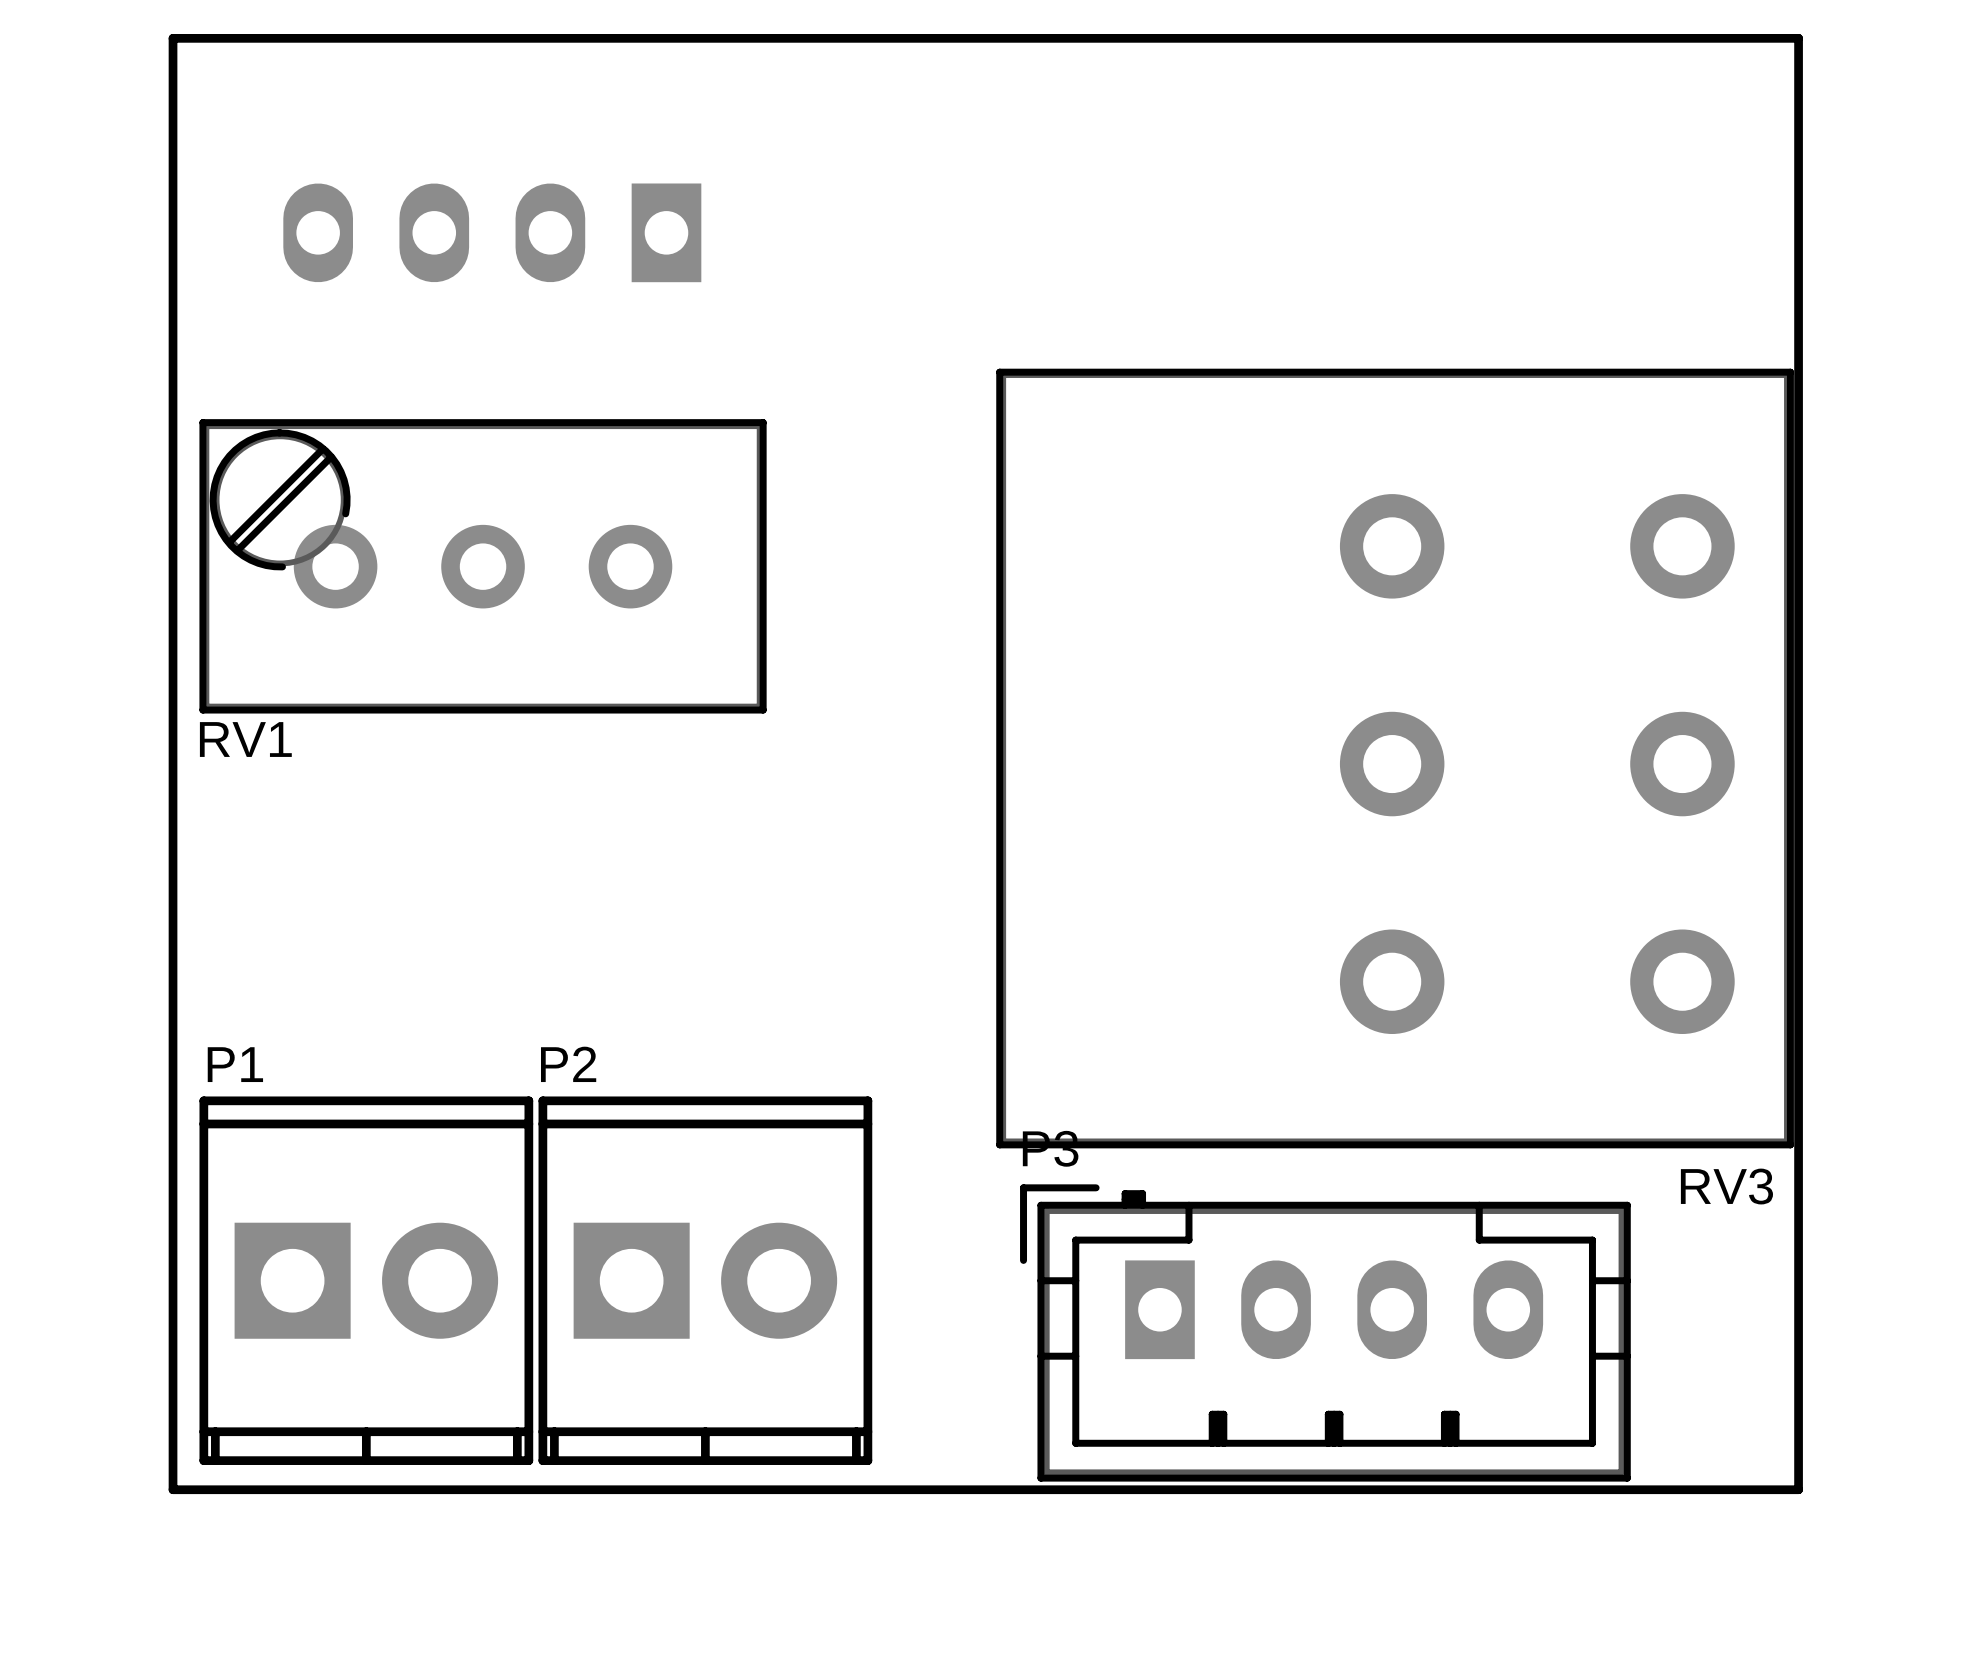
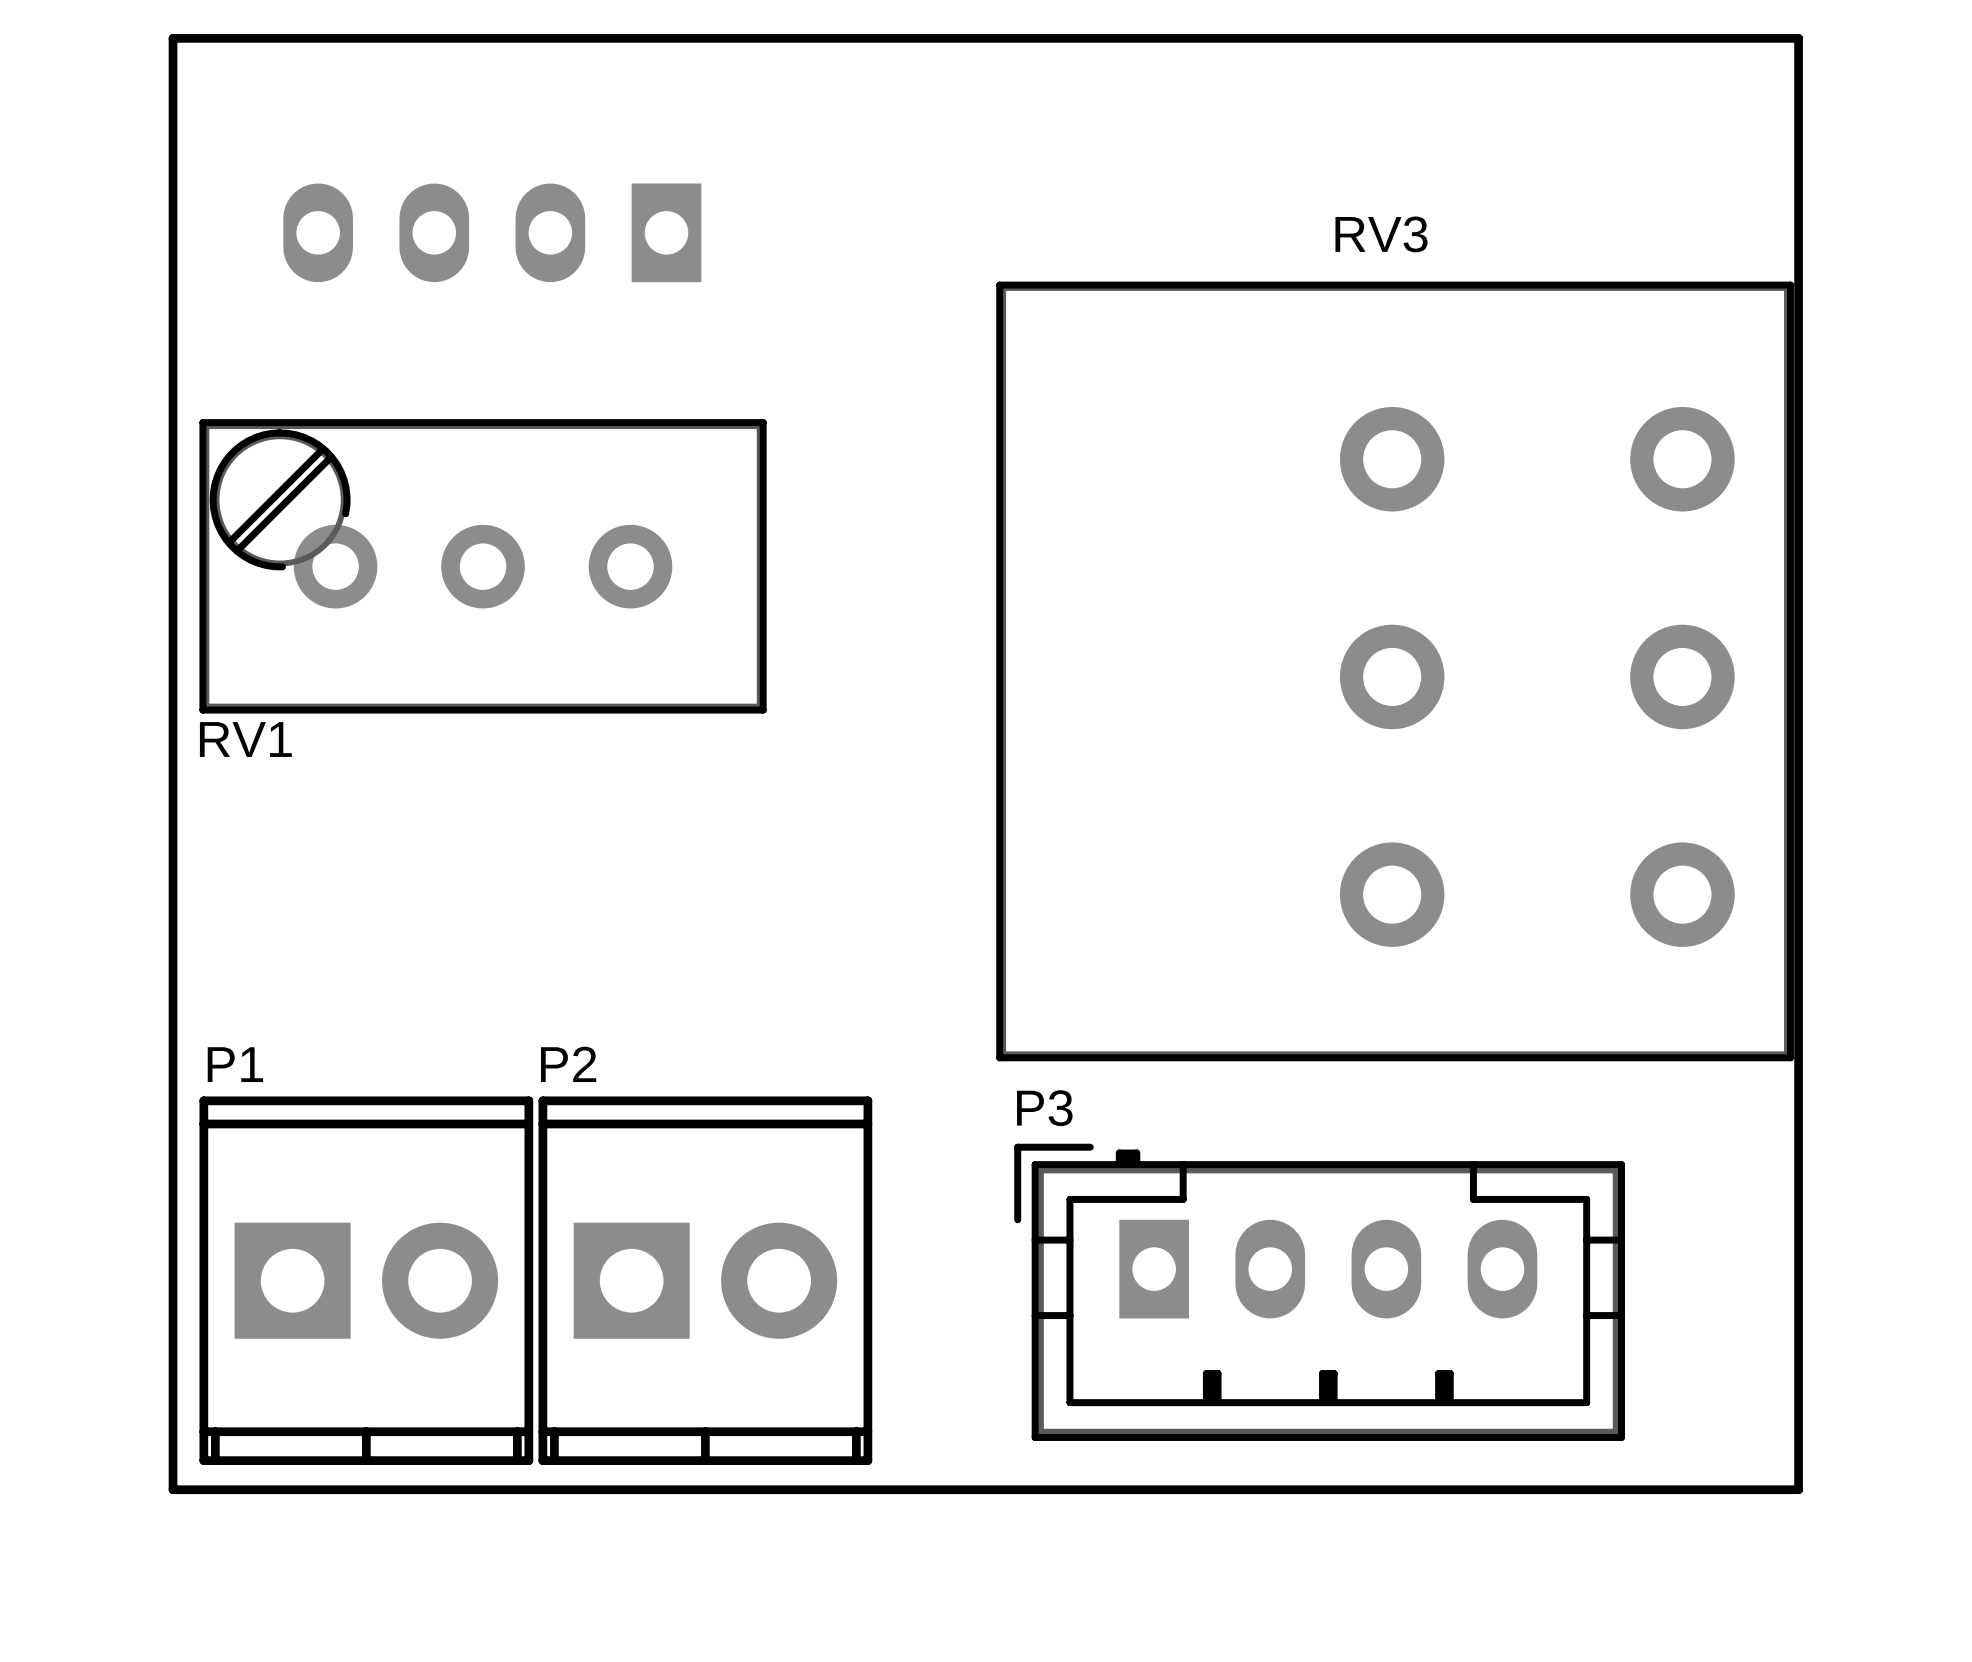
RV3 position: (1395, 758) -> (1395, 671)
RV3 name position: RV3 (1726, 1186) -> RV3 (1381, 234)
P3 position: (1325, 1332) -> (1319, 1292)

